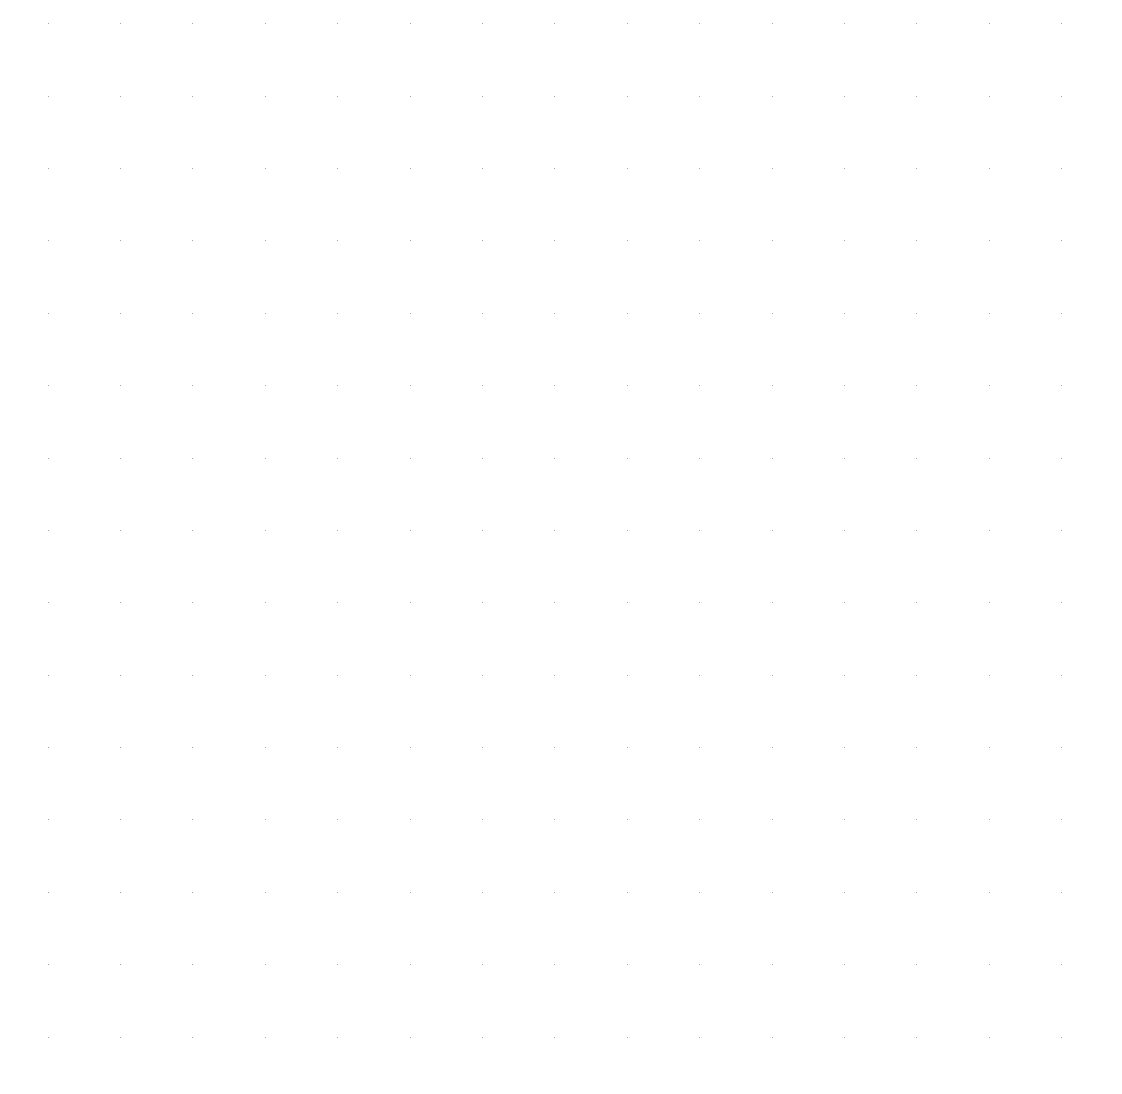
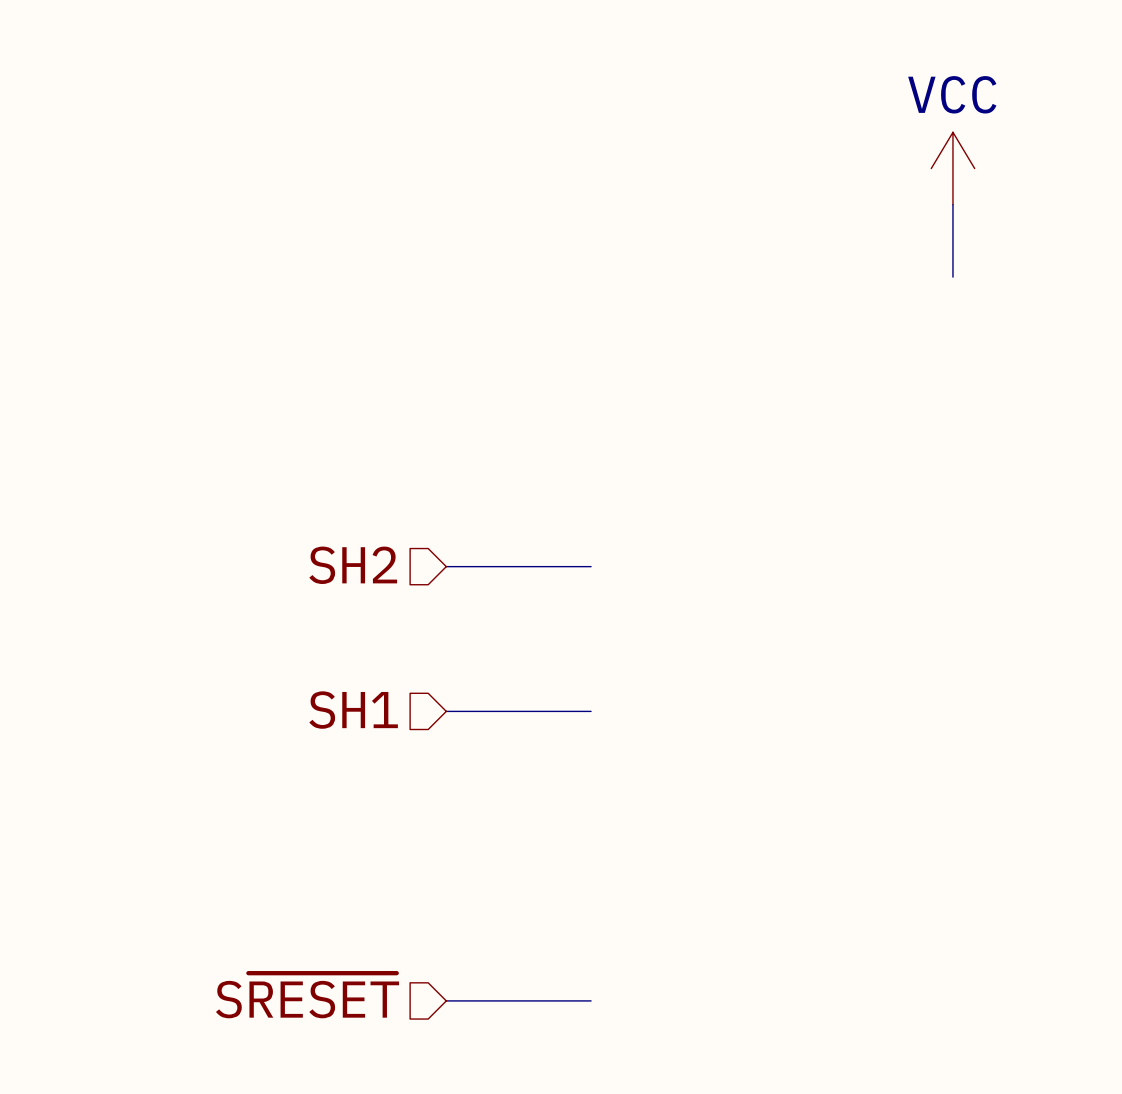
power symbol: none -> VCC (952, 168)
wire: none -> (952, 204) (952, 277)
hierarchical label: none -> SH2 (353, 565)
wire: none -> (446, 566) (591, 566)
hierarchical label: none -> SH1 (353, 710)
wire: none -> (446, 711) (591, 711)
hierarchical label: none -> S~{RESET} (307, 995)
wire: none -> (446, 1000) (591, 1000)

